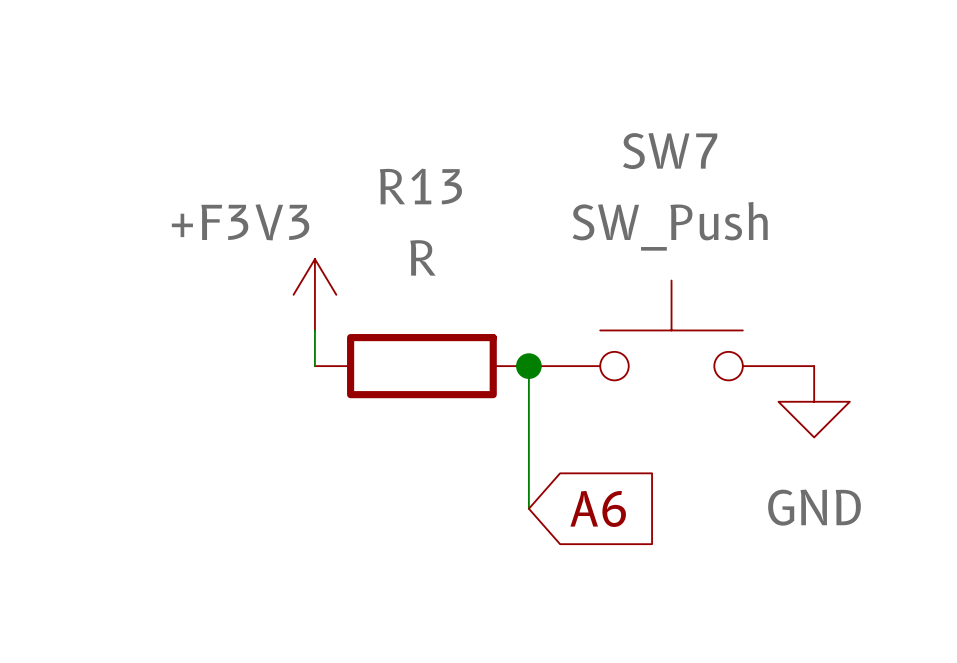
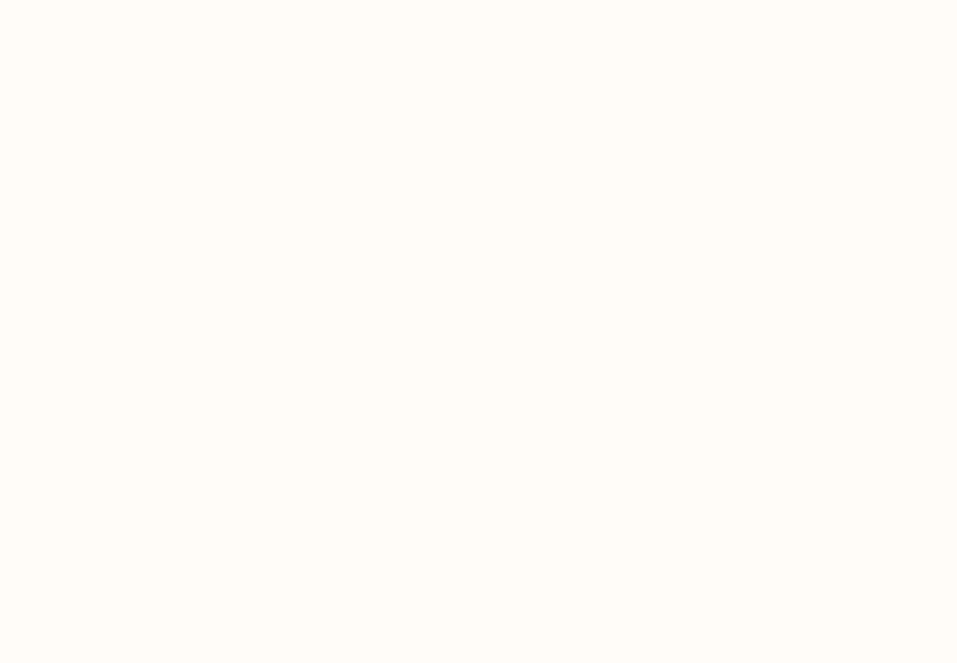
power symbol: +F3V3 (314, 294) -> none
wire: (314, 330) (314, 366) -> none
SW7: SW_Push (671, 330) -> none
R13: R (421, 366) -> none
wire: (528, 366) (528, 508) -> none
junction: (528, 366) -> none
power symbol: GND (814, 401) -> none
global label: A6 (598, 508) -> none

